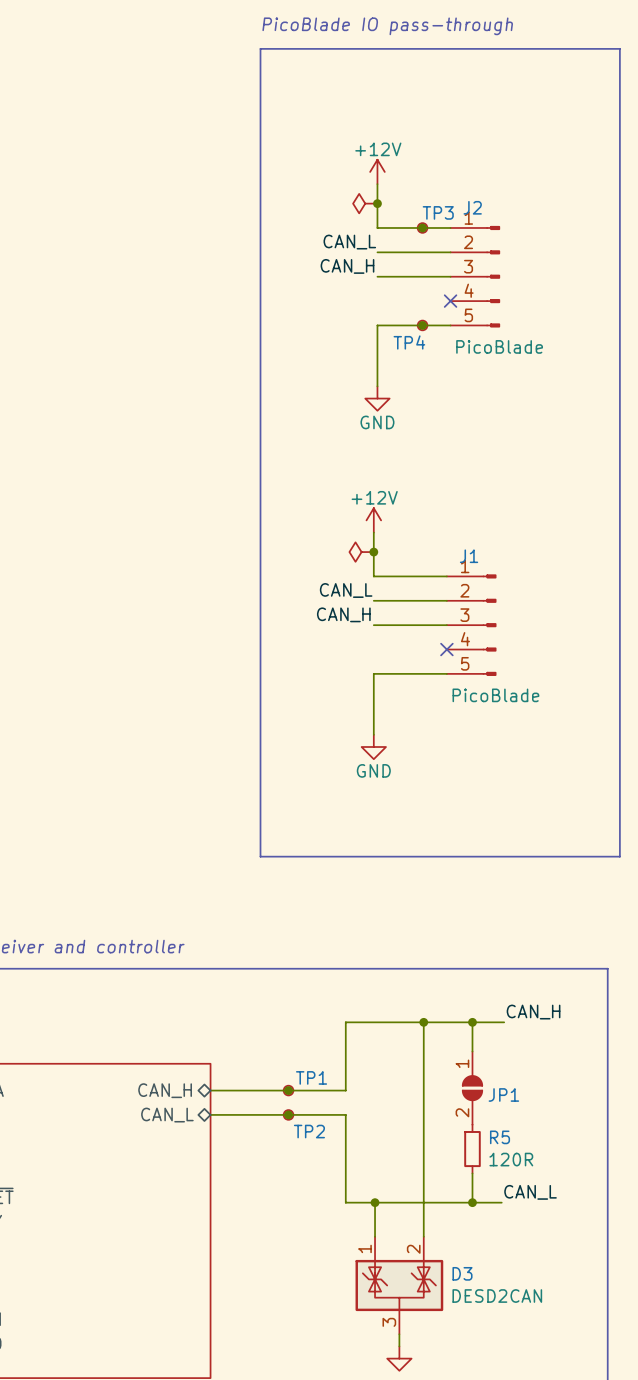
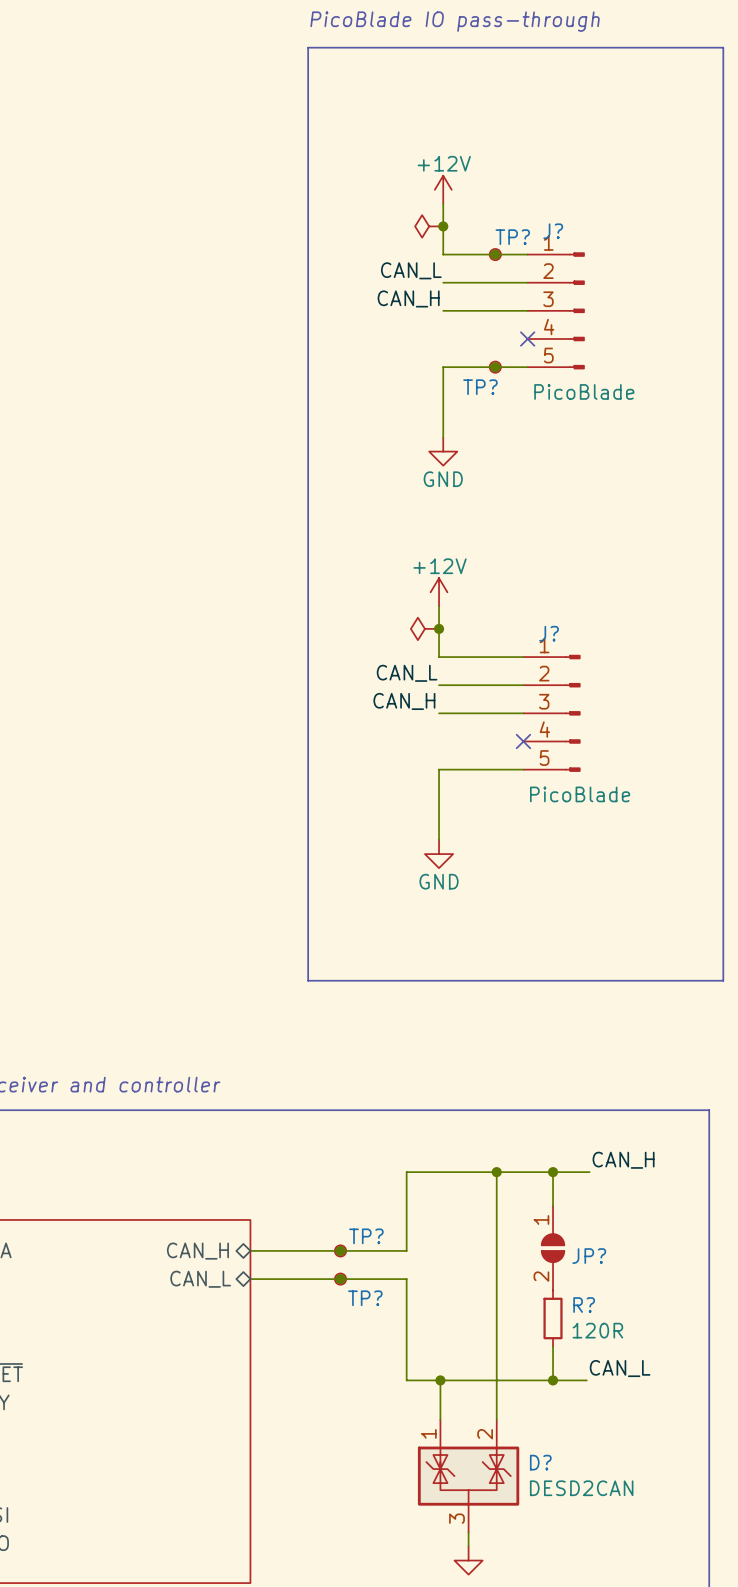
J2 name: J2 (472, 207) -> J? (553, 231)
TP3 name: TP3 (438, 212) -> TP? (512, 237)
TP4 name: TP4 (409, 342) -> TP? (480, 387)
J1 name: J1 (469, 556) -> J? (549, 633)
TP1 name: TP1 (311, 1077) -> TP? (366, 1236)
JP1 name: JP1 (503, 1094) -> JP? (589, 1256)
TP2 name: TP2 (309, 1131) -> TP? (365, 1298)
R5 name: R5 (500, 1137) -> R? (584, 1305)
D3 name: D3 (462, 1273) -> D? (540, 1462)

